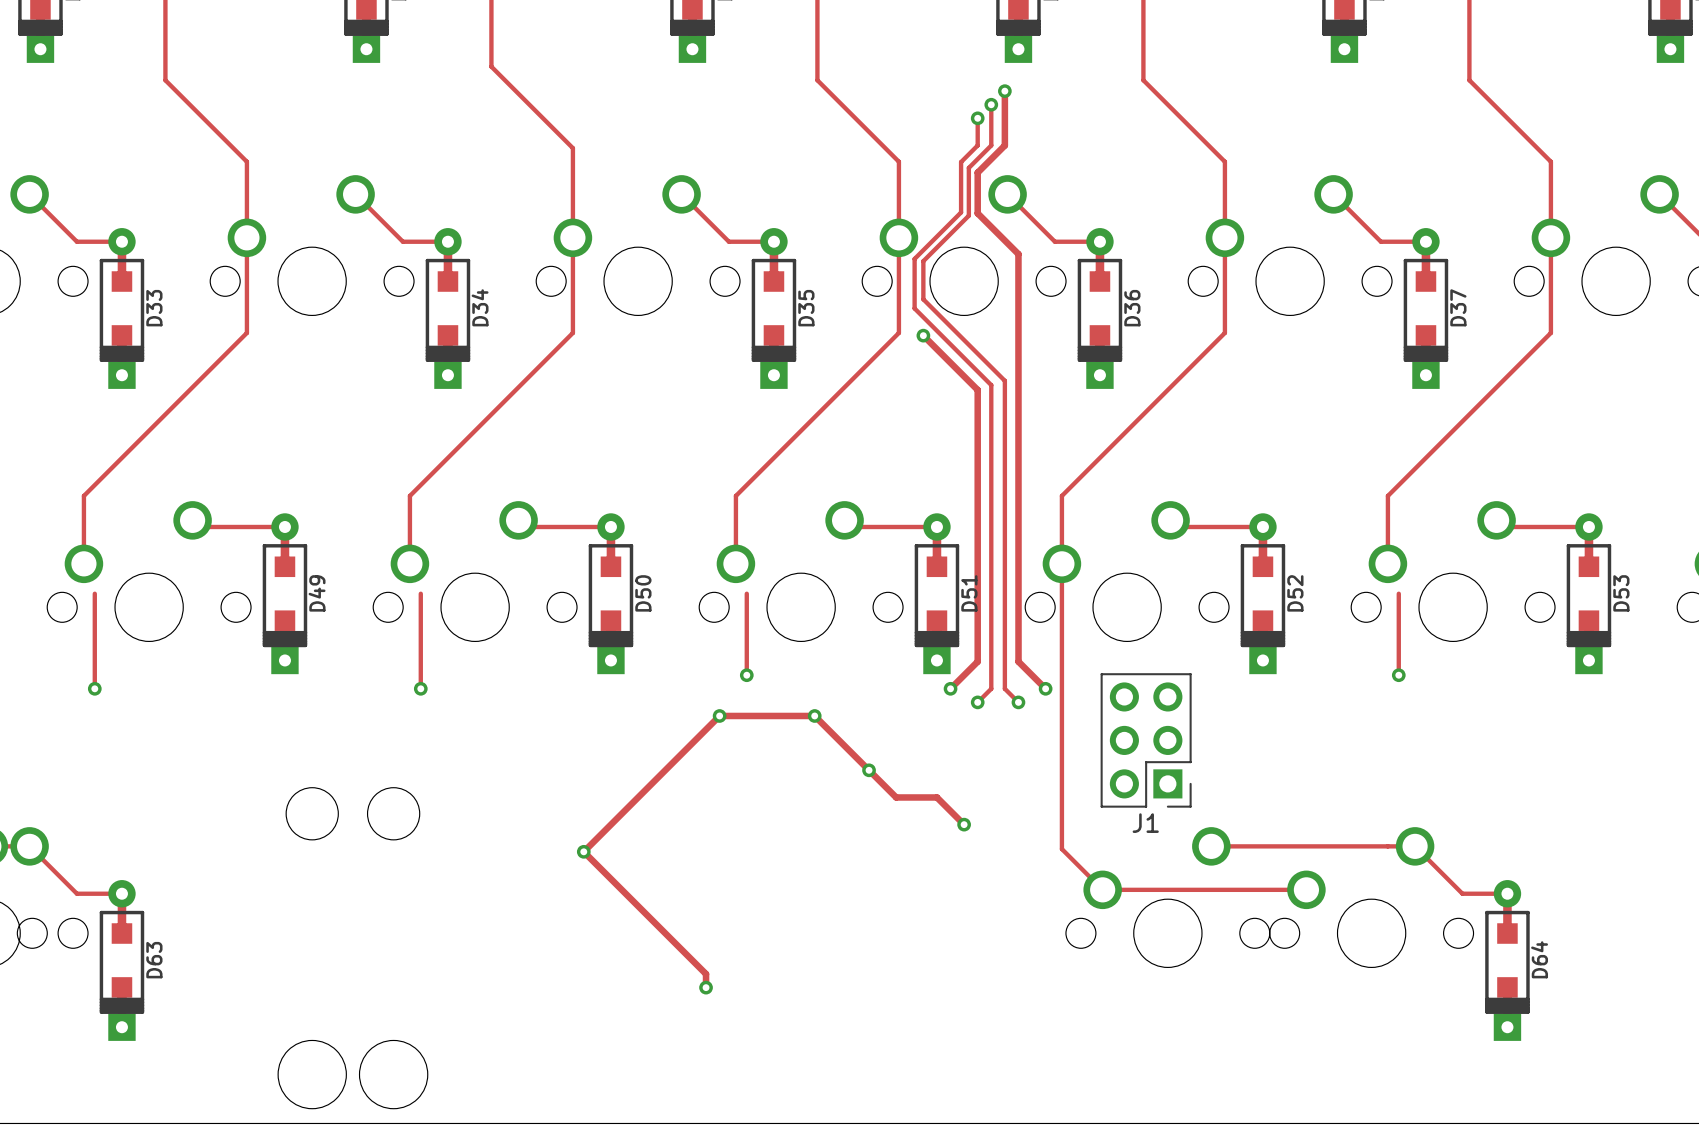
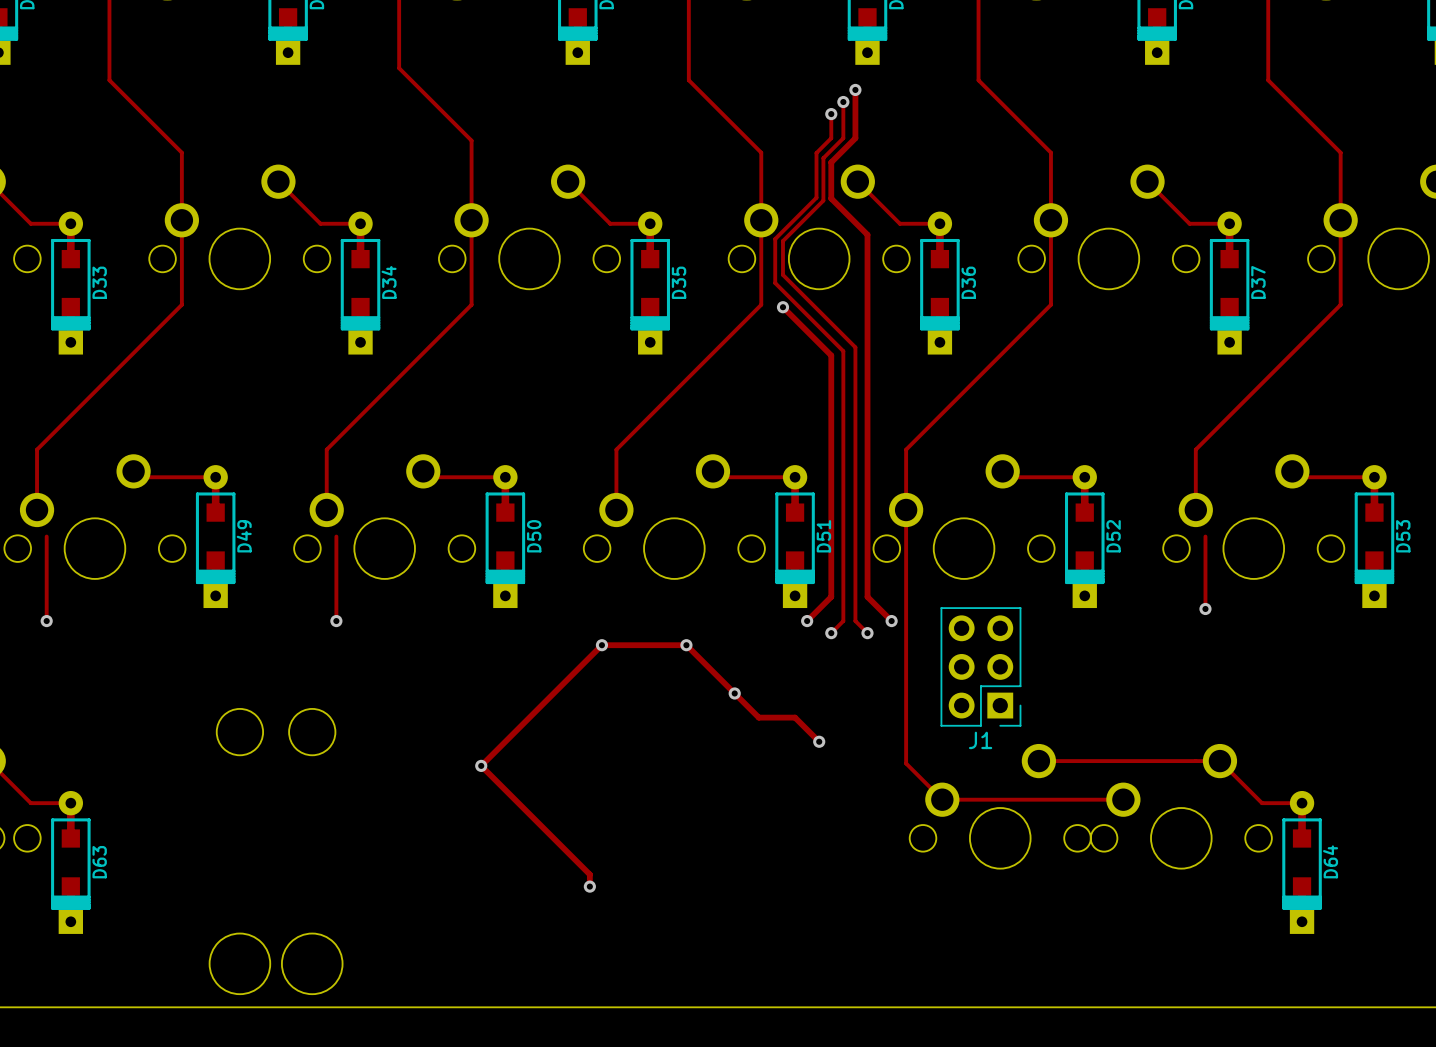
track: (746, 593) (746, 675) -> none
via: (746, 675) -> none

